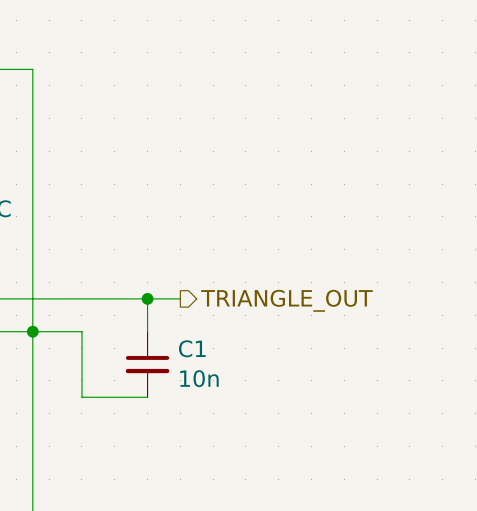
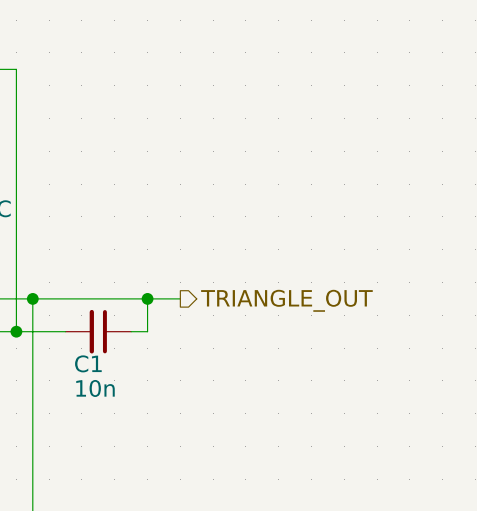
wire: (16, 69) (32, 69) (32, 298) -> (16, 69) (16, 331)
junction: none -> (32, 298)
junction: none -> (16, 331)
junction: (32, 331) -> none
wire: (65, 331) (81, 331) (81, 397) (147, 397) -> none
wire: none -> (131, 331) (147, 331)
C1 name position: C1 (192, 348) -> C1 (88, 363)
C1 rotation: 0° (147, 364) -> 90° clockwise (98, 331)
C1 position: (147, 364) -> (98, 331)

